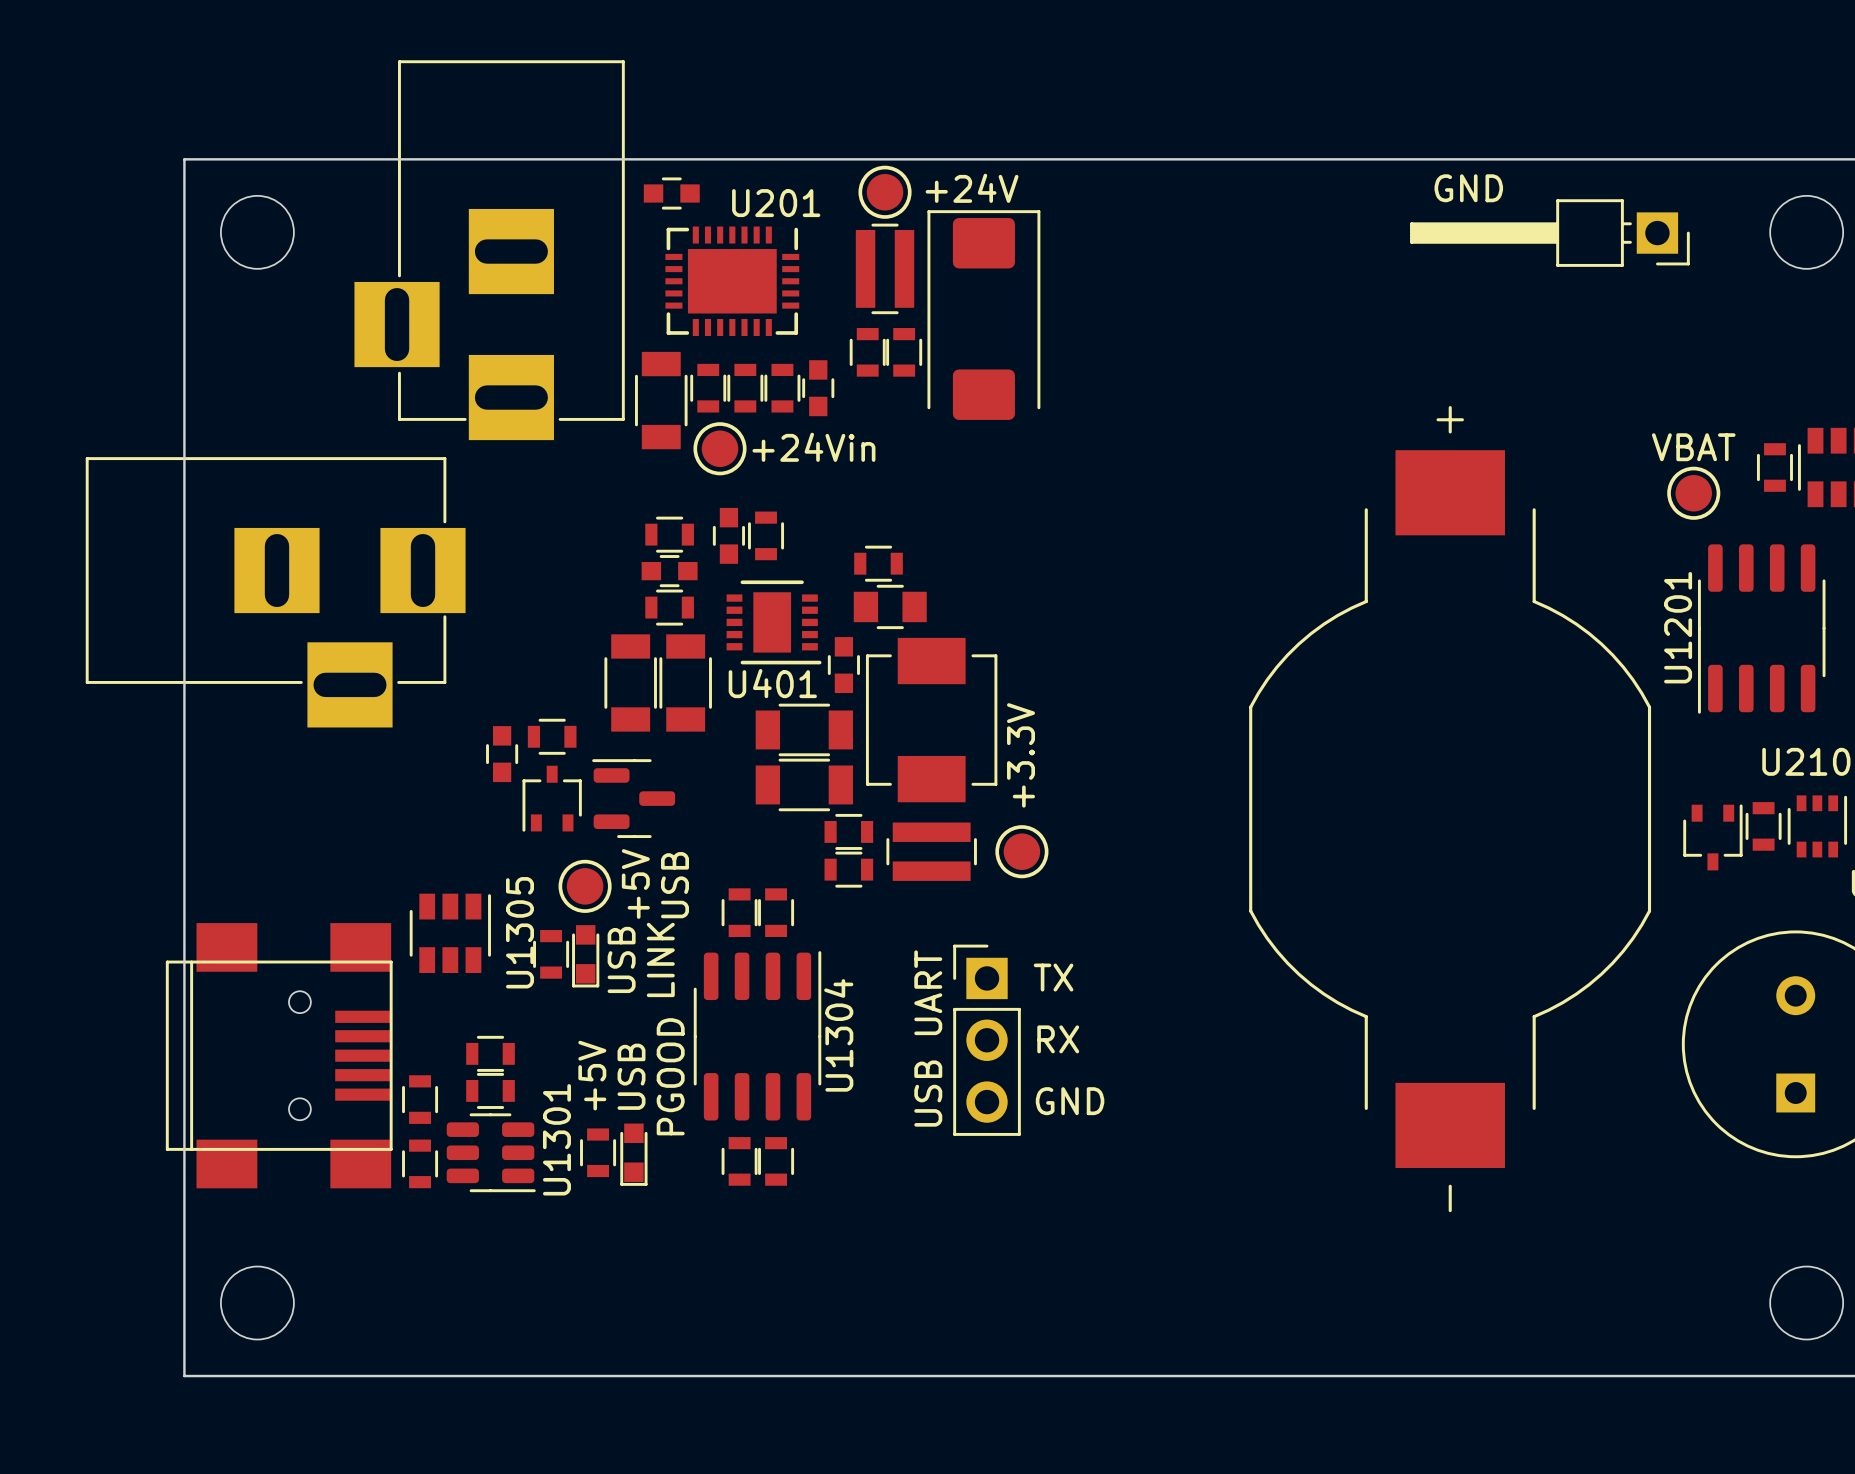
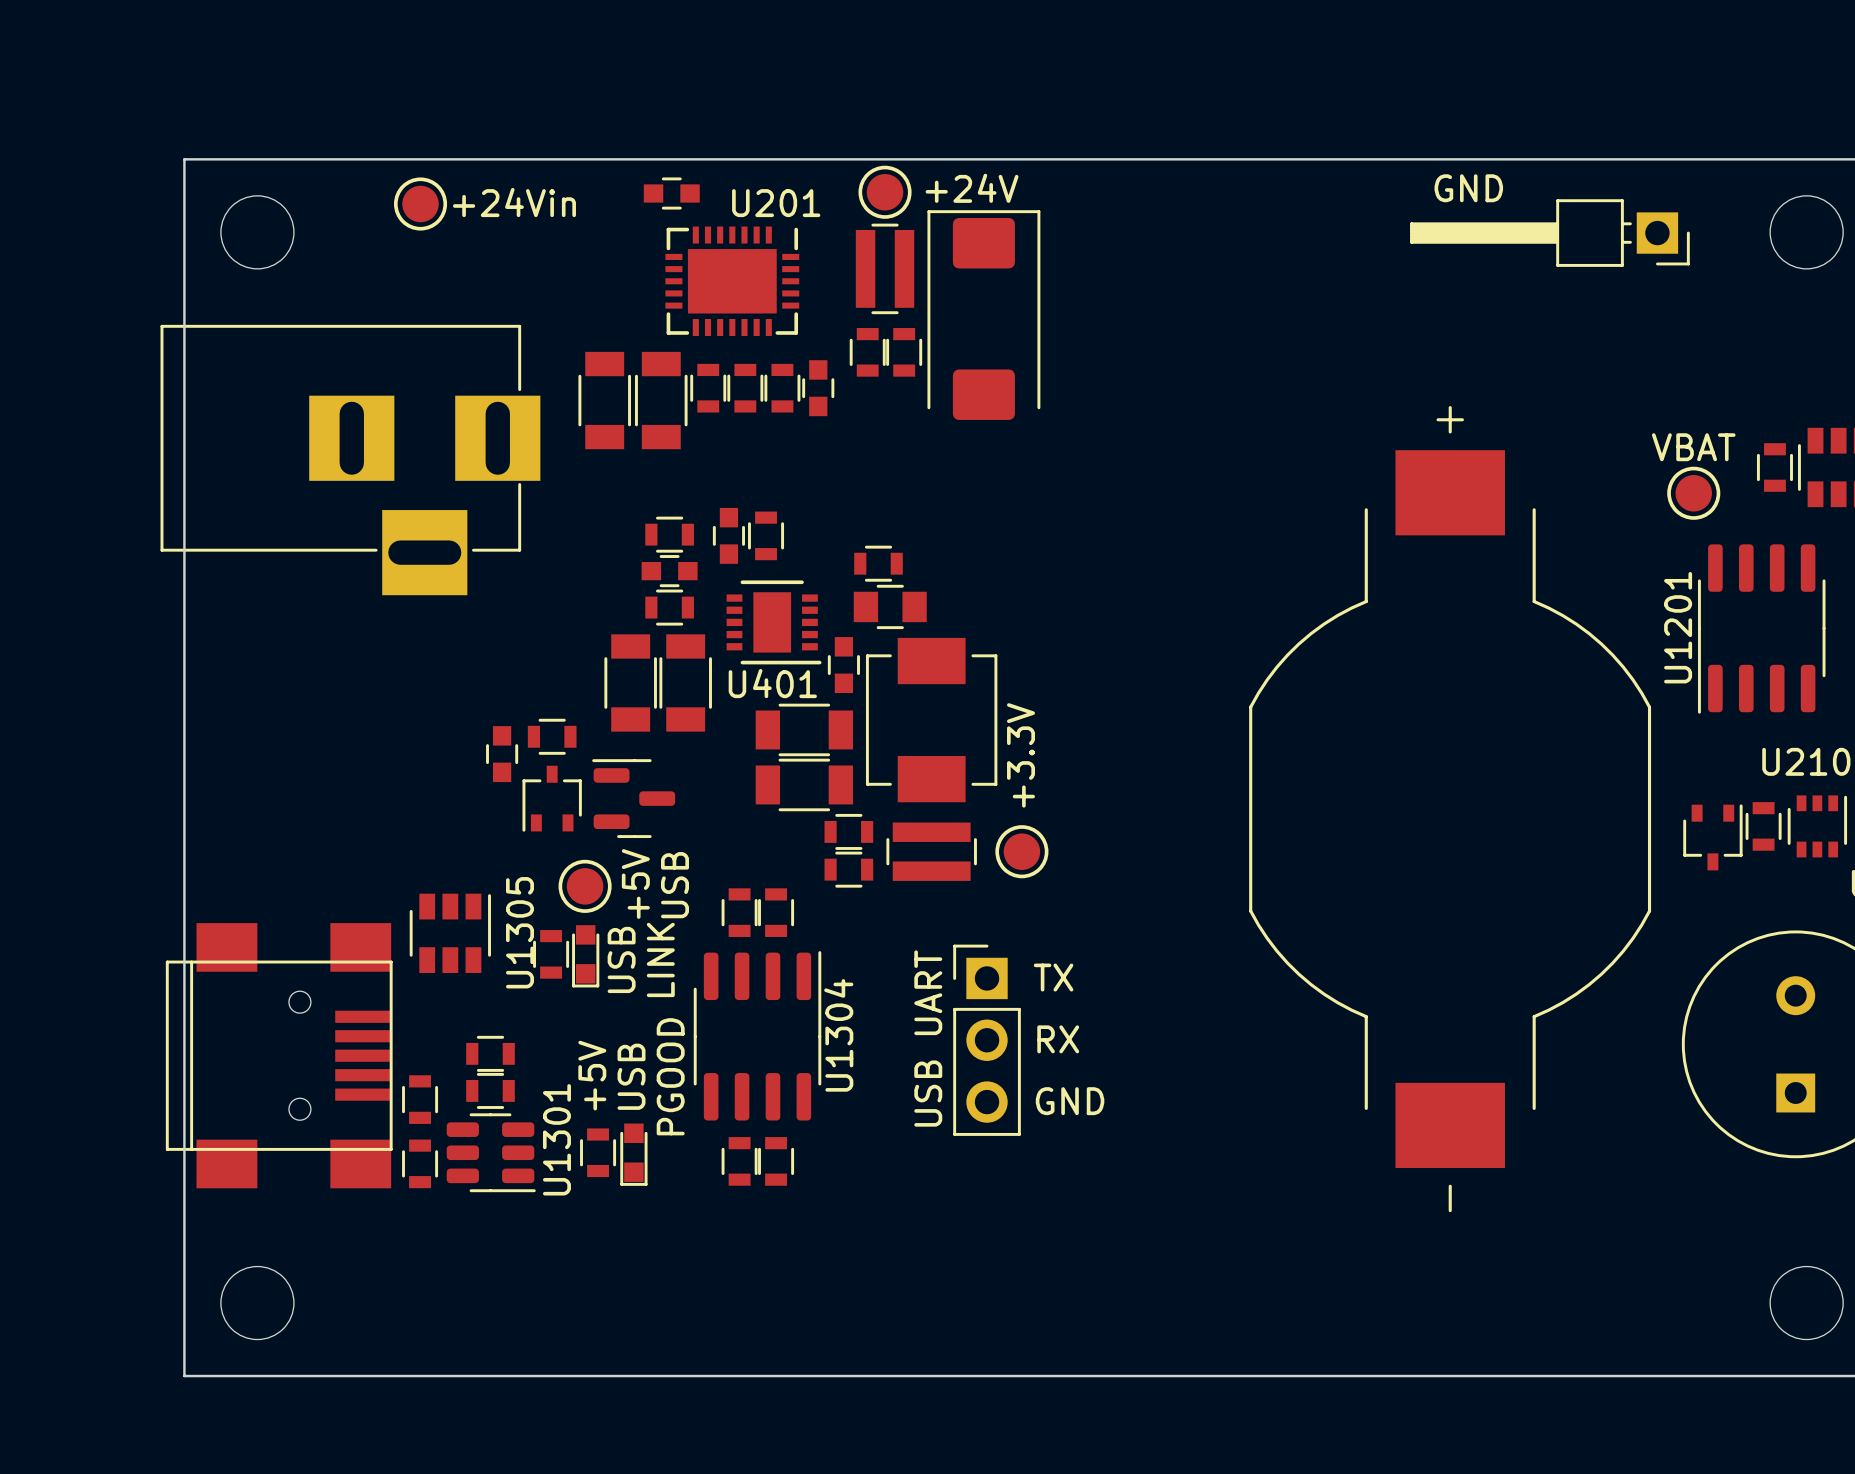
part: (489, 250) -> none
part: none -> (604, 400)
text position: +24Vin (813, 447) -> +24Vin (514, 202)
part position: (720, 448) -> (420, 204)
part: none -> (350, 460)
part: (275, 592) -> none

